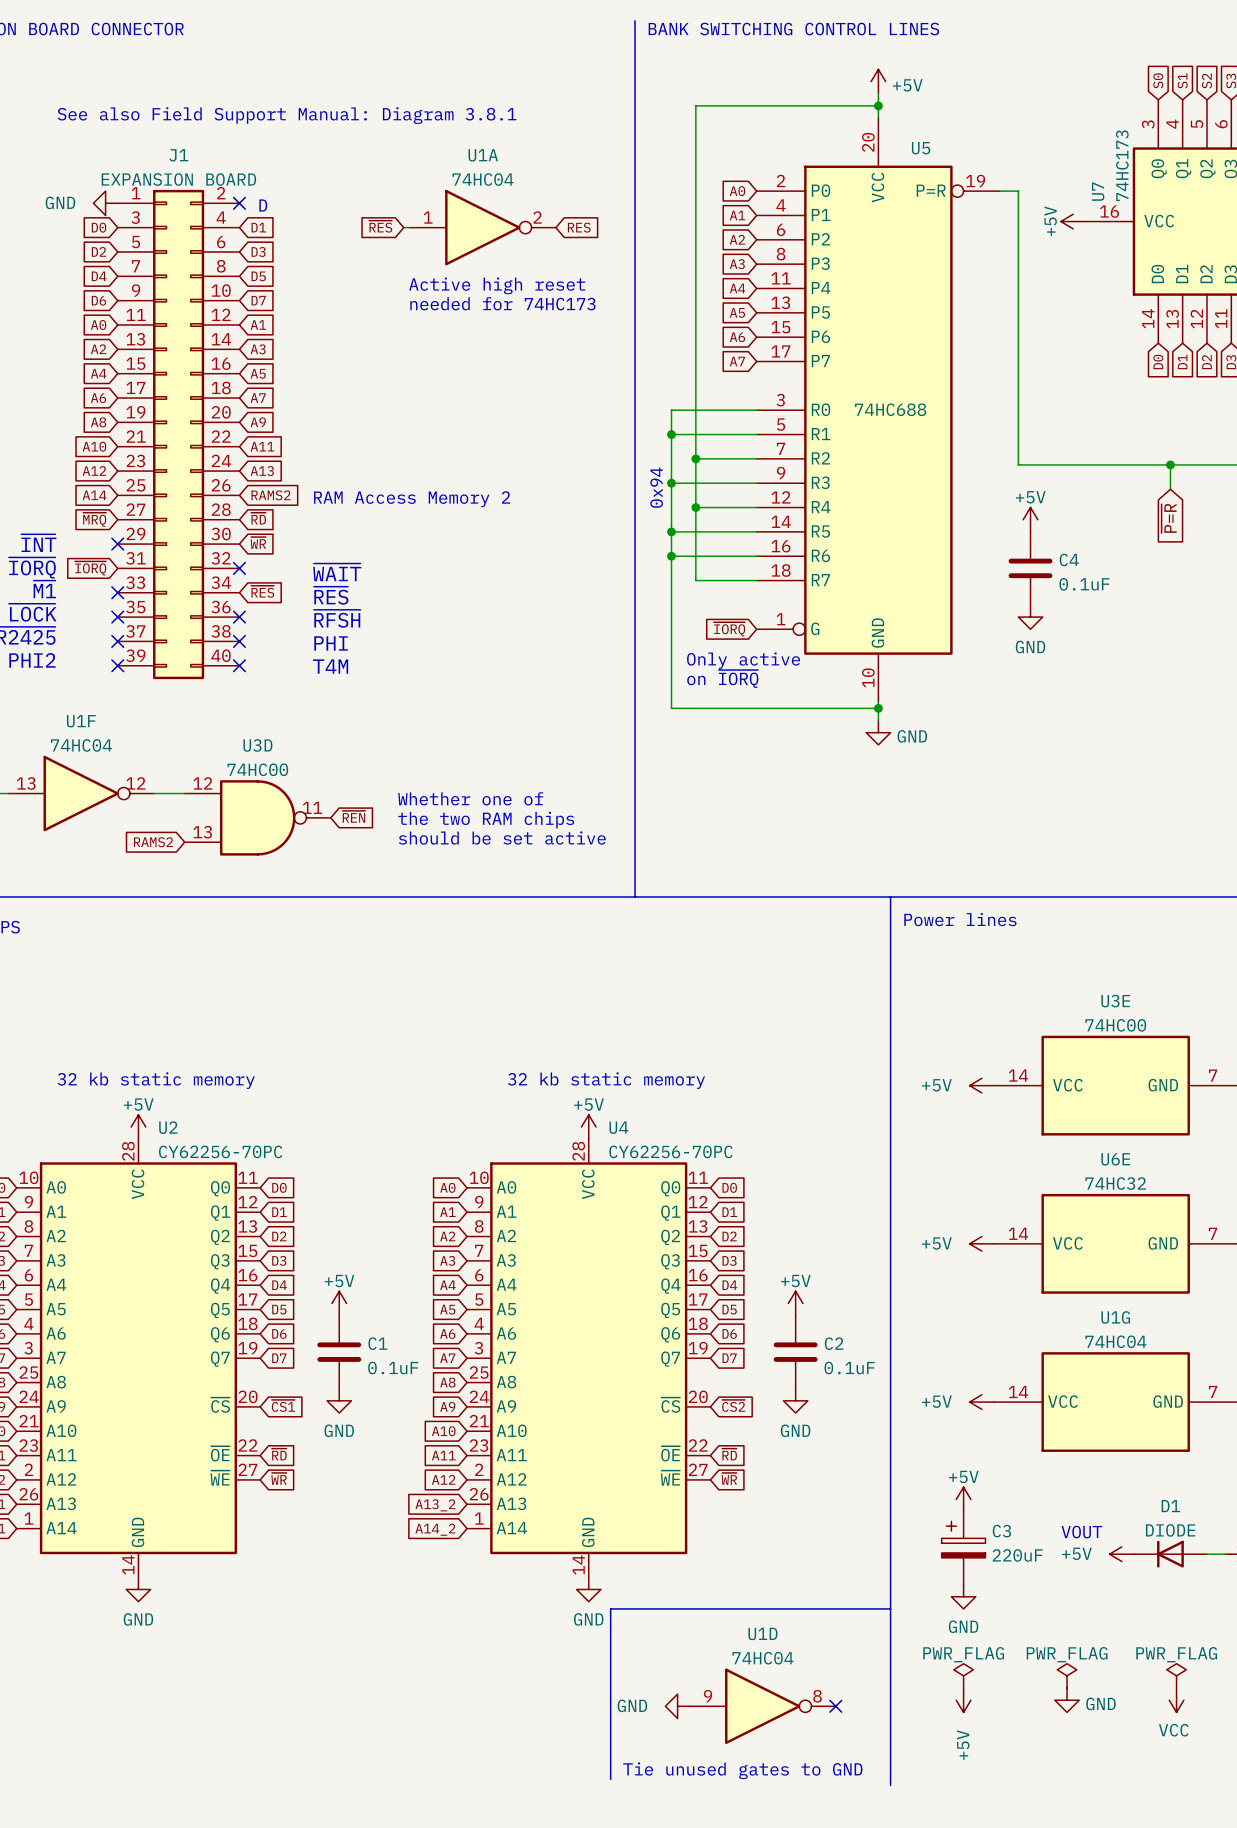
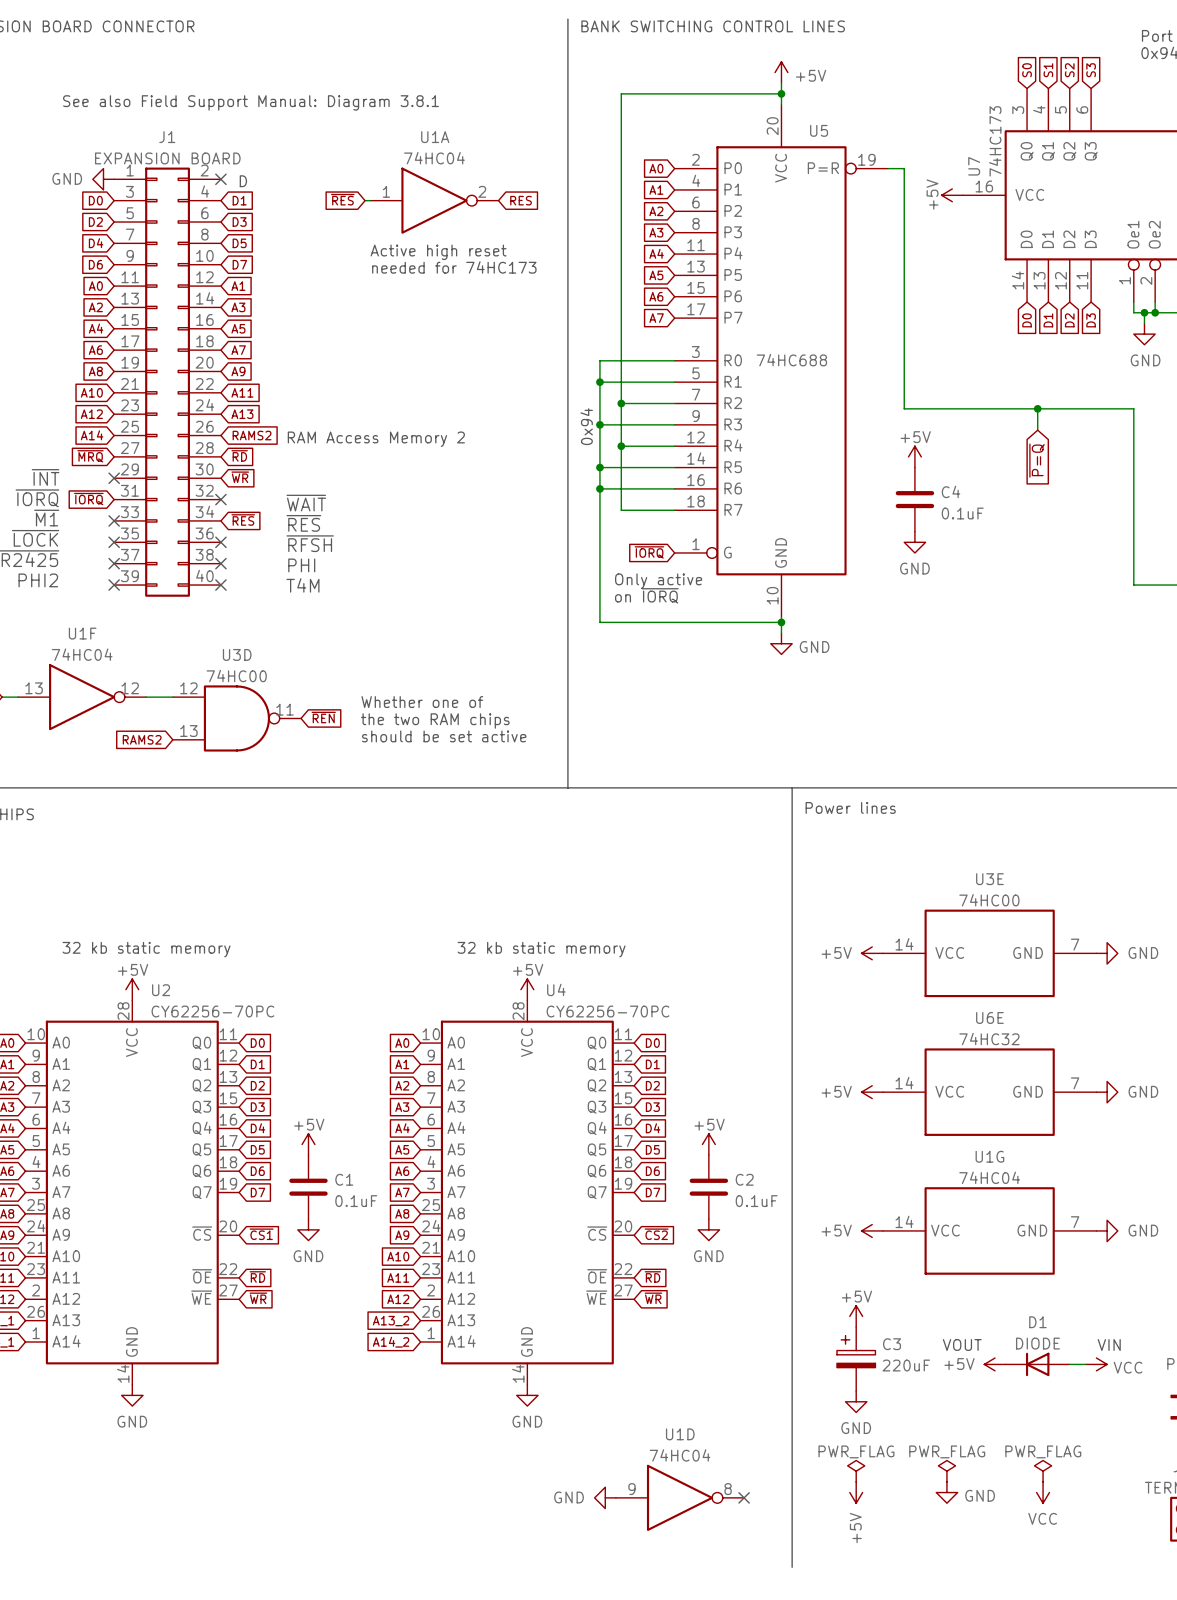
global label: ~{P=R} (1169, 518) -> ~{P=Q} (1036, 460)
line: (890, 1608) (610, 1608) (610, 1779) -> none
text: Tie unused gates to GND (742, 1770) -> none

